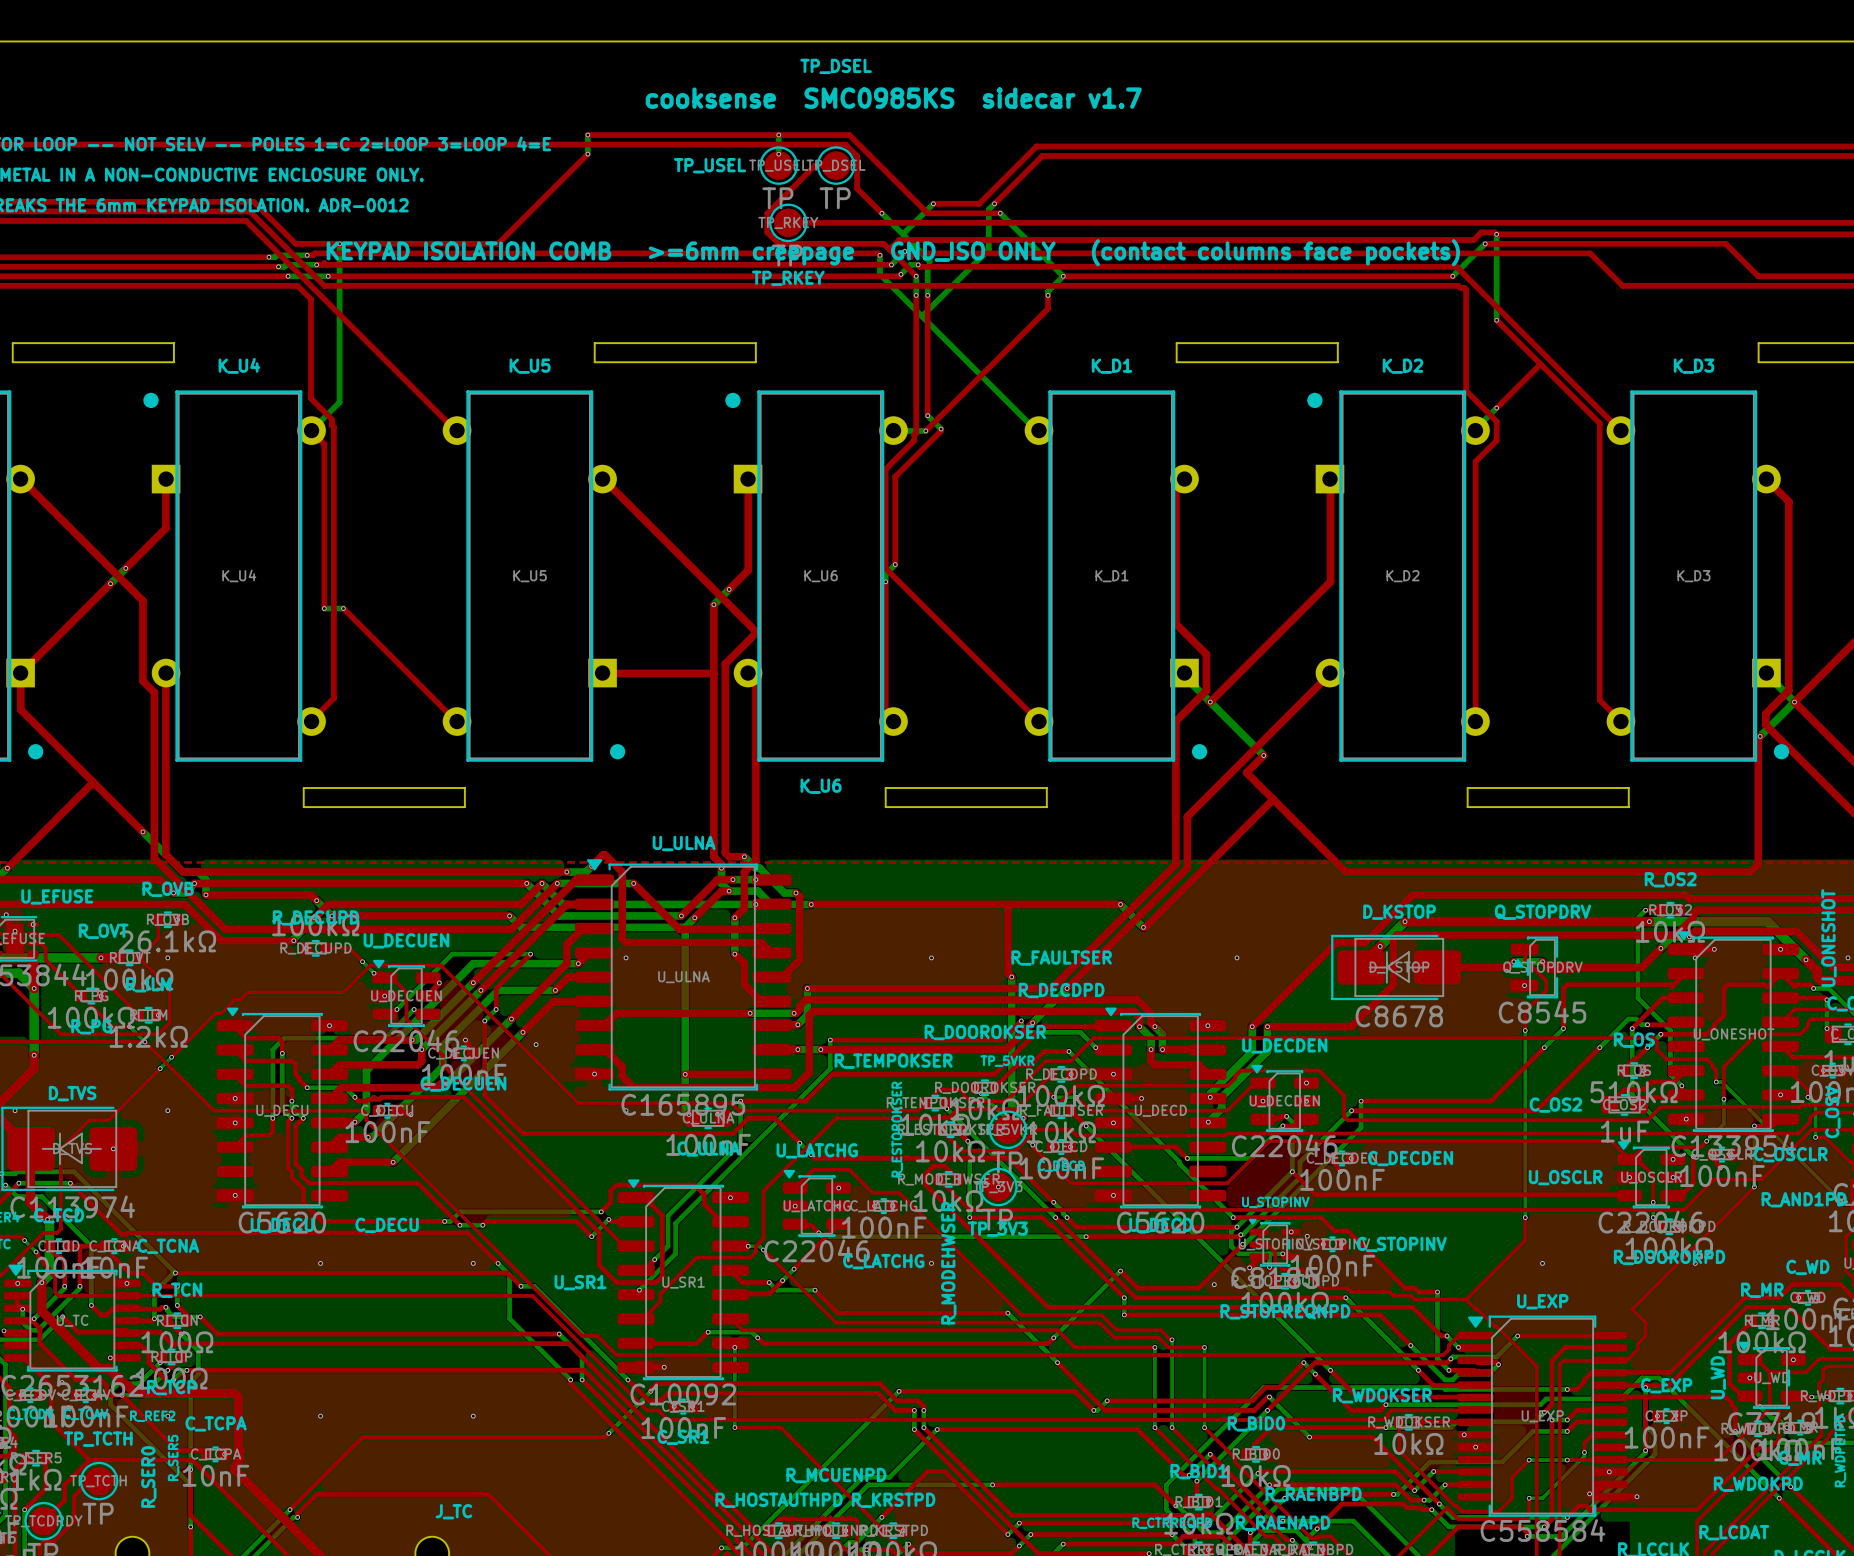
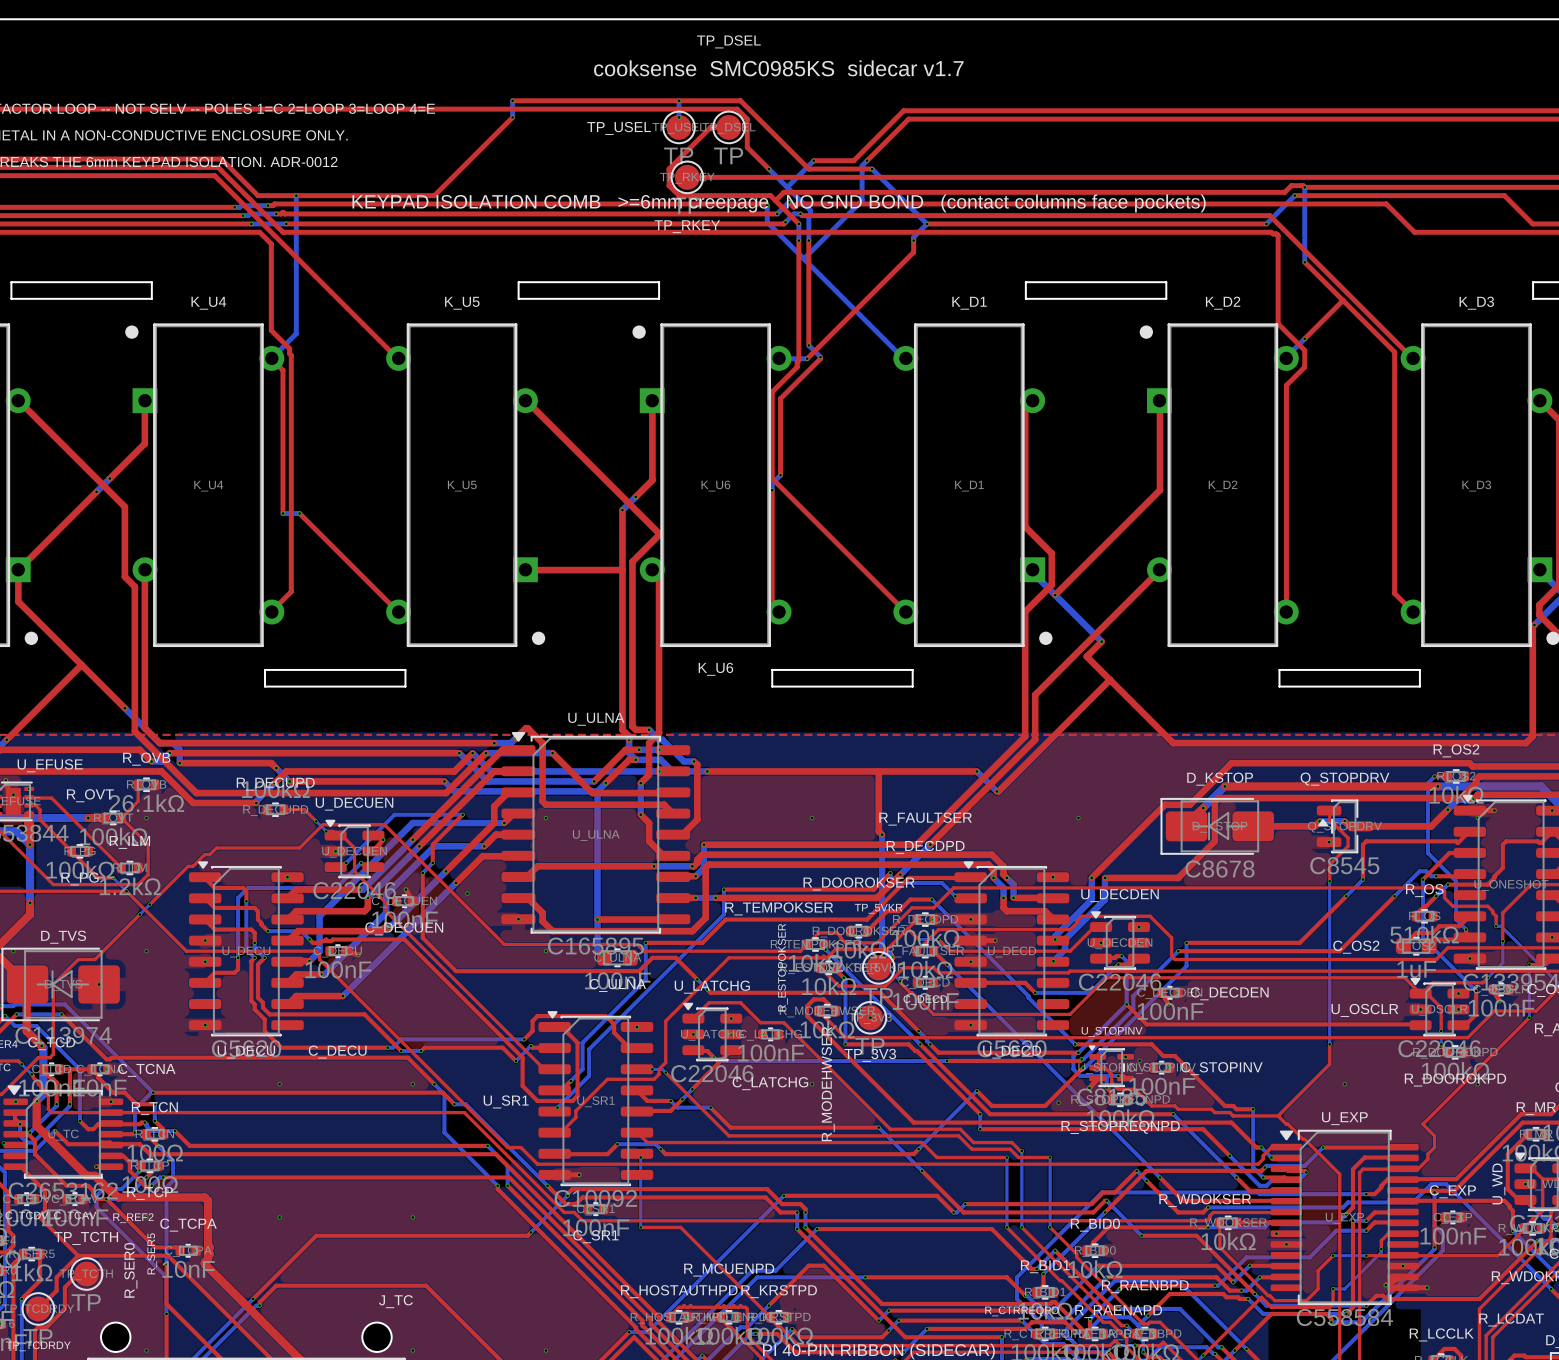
text: KEYPAD ISOLATION COMB >=6mm creepage GND_ISO ONLY (contact columns face pockets) (893, 252) -> KEYPAD ISOLATION COMB >=6mm creepage NO GND BOND (contact columns face pockets) (779, 203)

